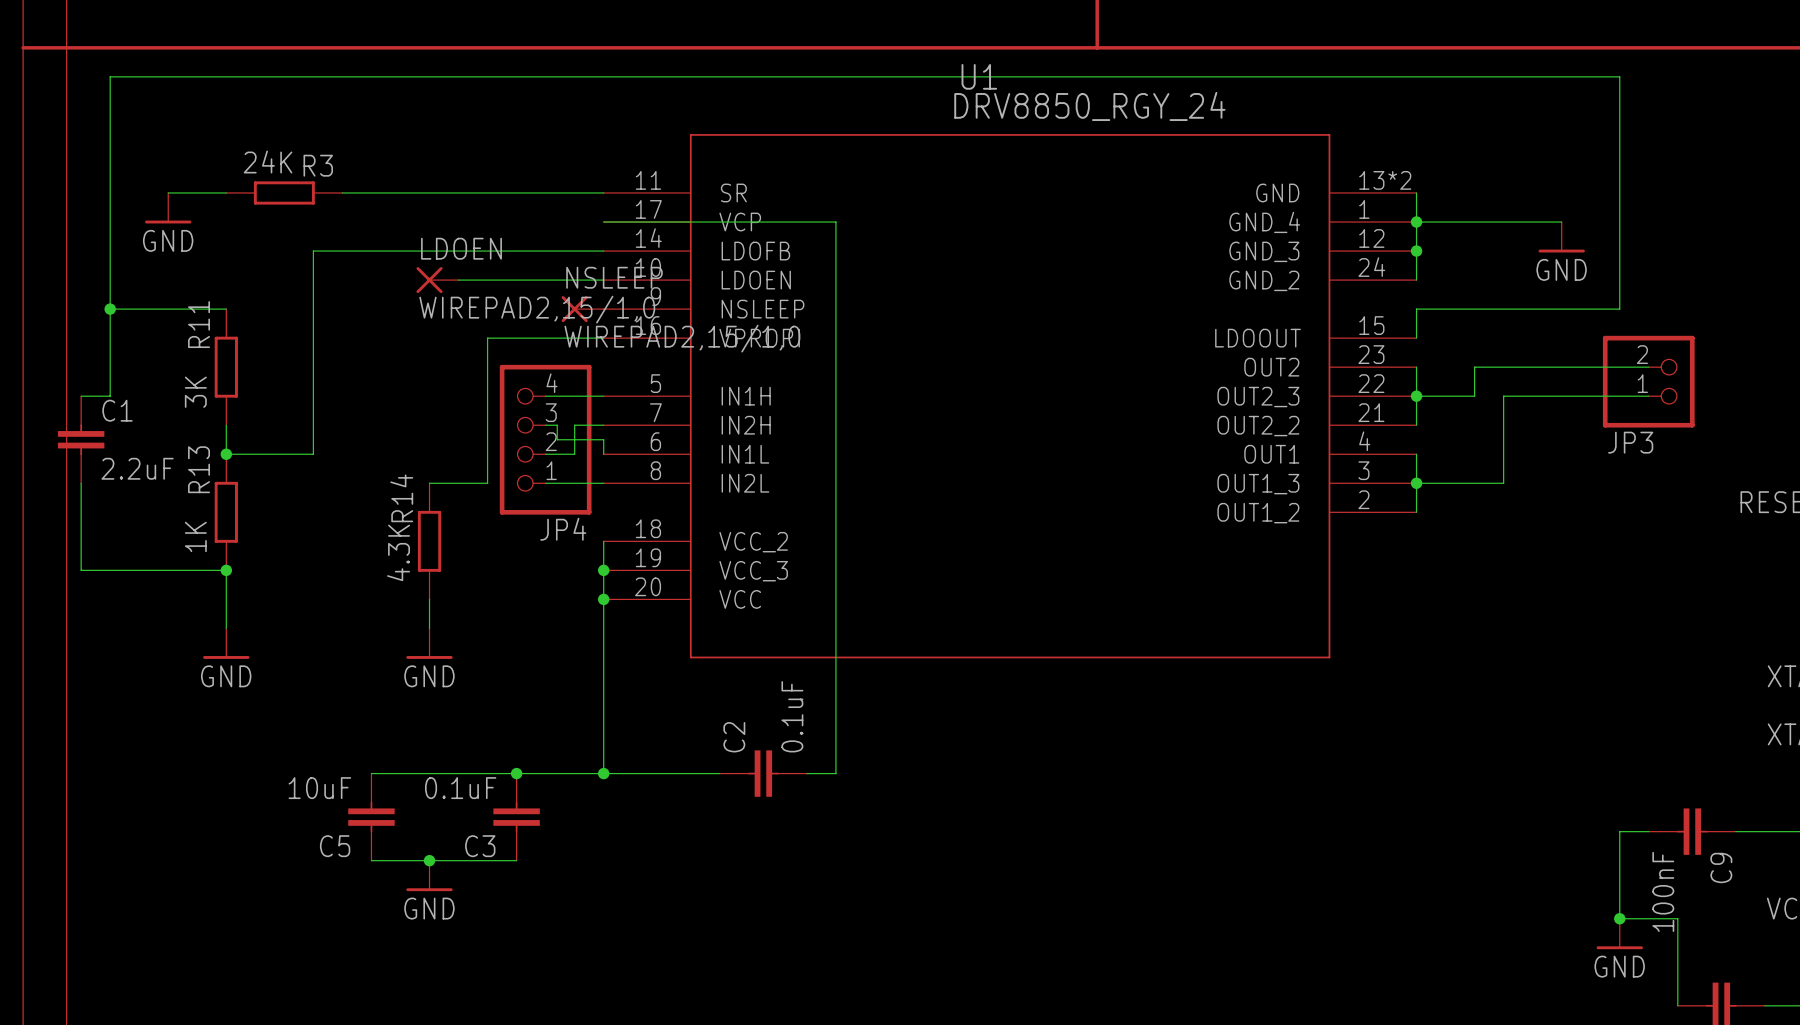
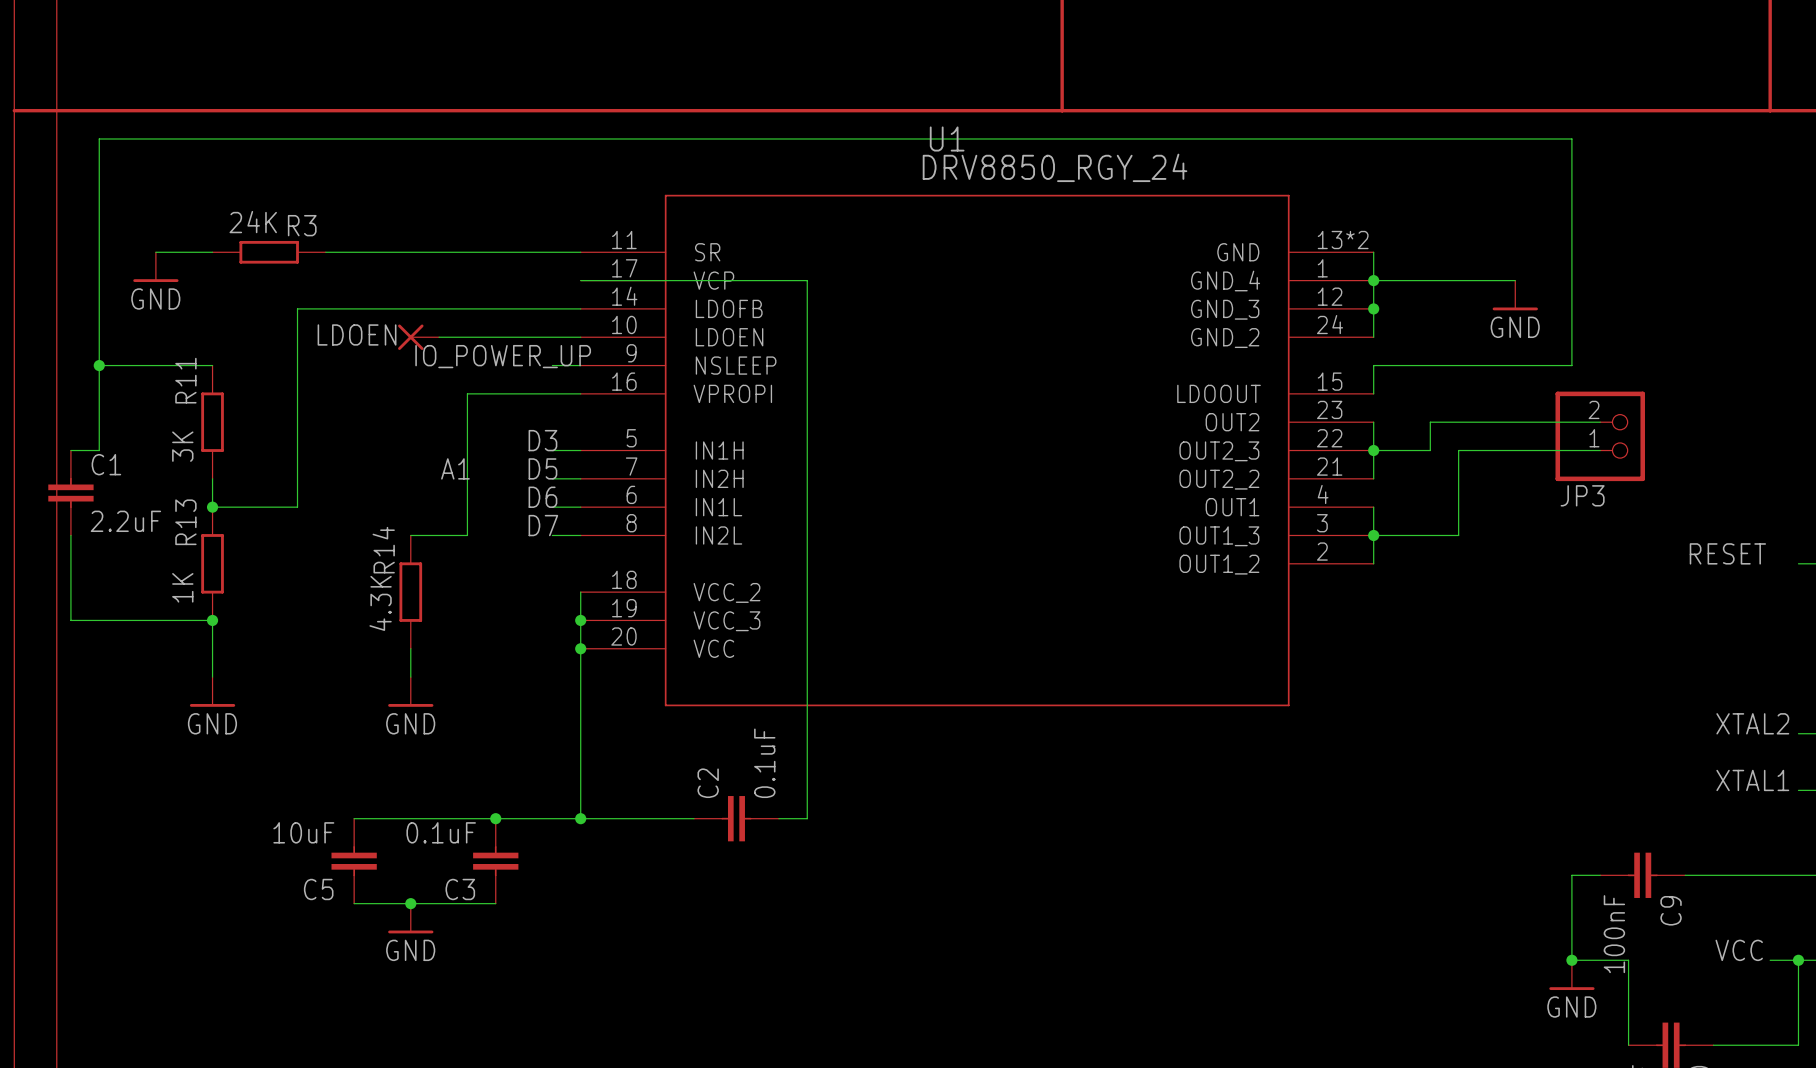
LDOEN name position: LDOEN (461, 248) -> LDOEN (357, 334)
label: none -> IO_POWER_UP (503, 356)
LDOEN value: WIREPAD2,15/1,0 (537, 309) -> none
NSLEEP: WIREPAD2,15/1,0 (582, 309) -> none
label: none -> D3 (542, 440)
label: none -> A1 (455, 468)
label: none -> D5 (542, 468)
wire: (545, 425) (557, 425) (557, 439) (603, 439) (603, 454) -> (552, 507) (580, 507)
wire: (574, 425) (574, 454) (545, 454) -> none
JP4: (545, 439) -> none
label: none -> D6 (542, 497)
label: none -> D7 (543, 525)
wire: (545, 483) (574, 483) -> none

